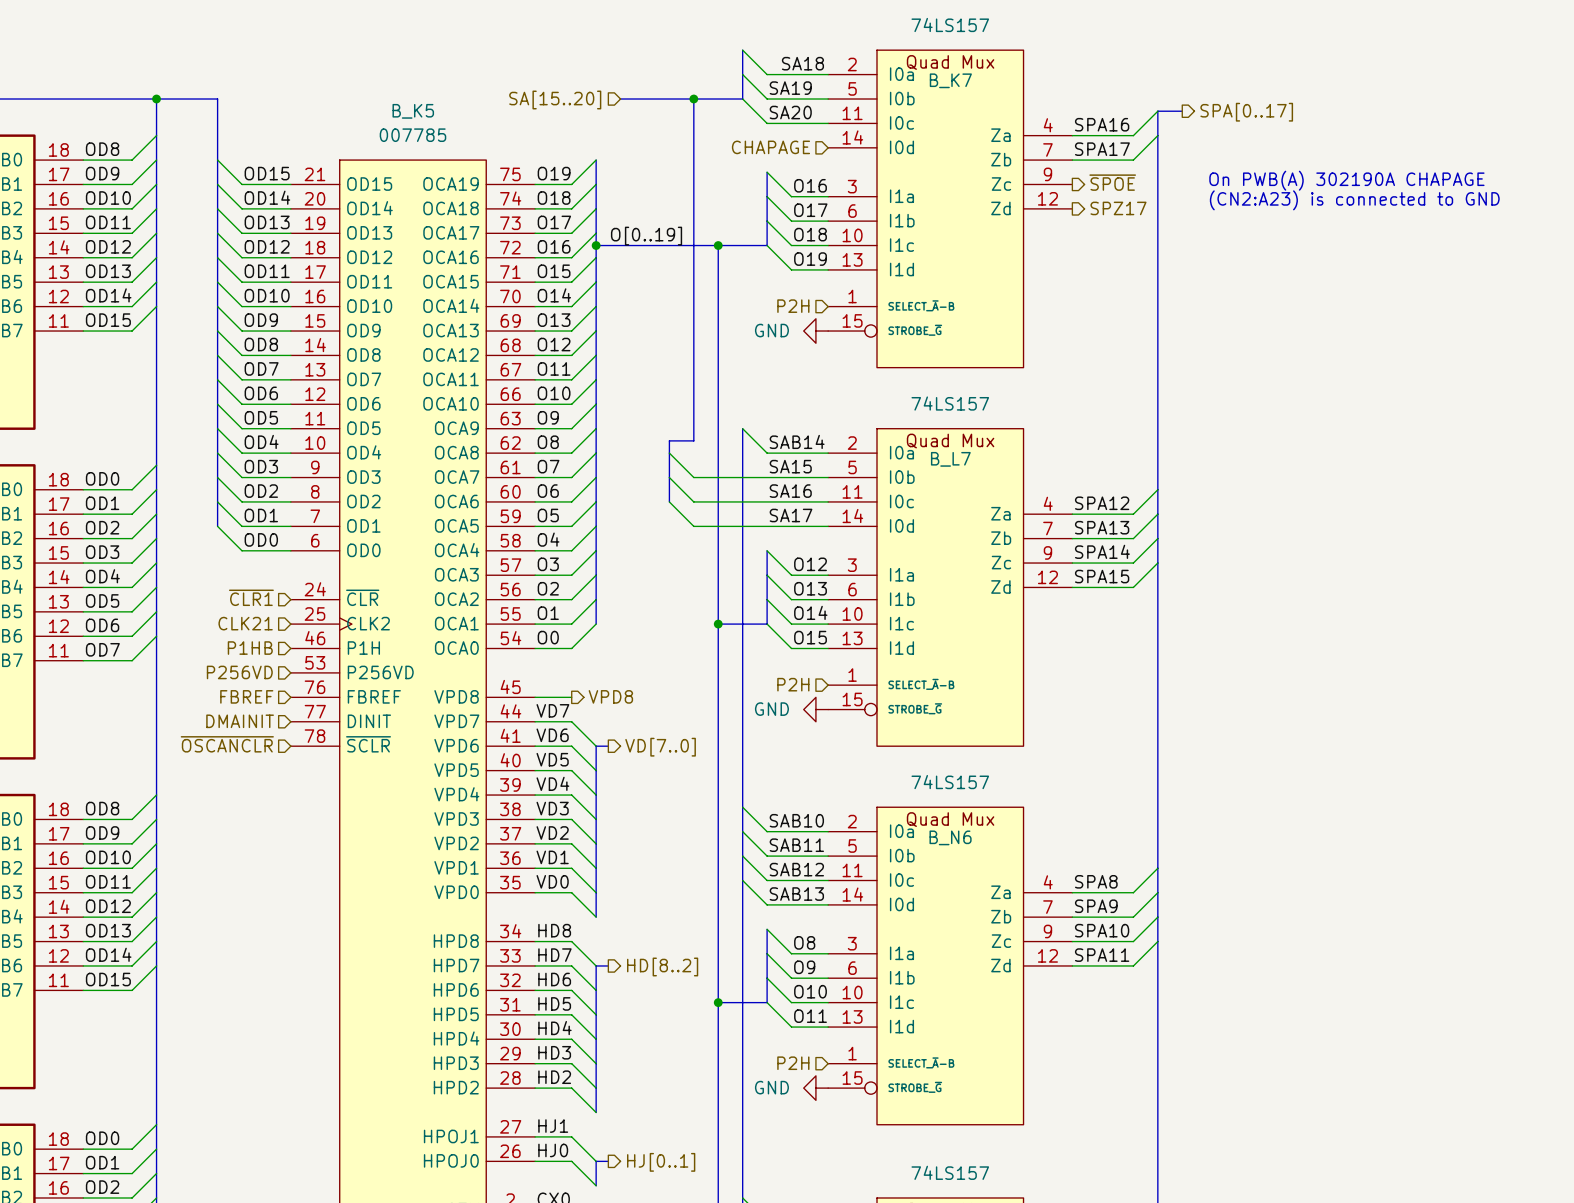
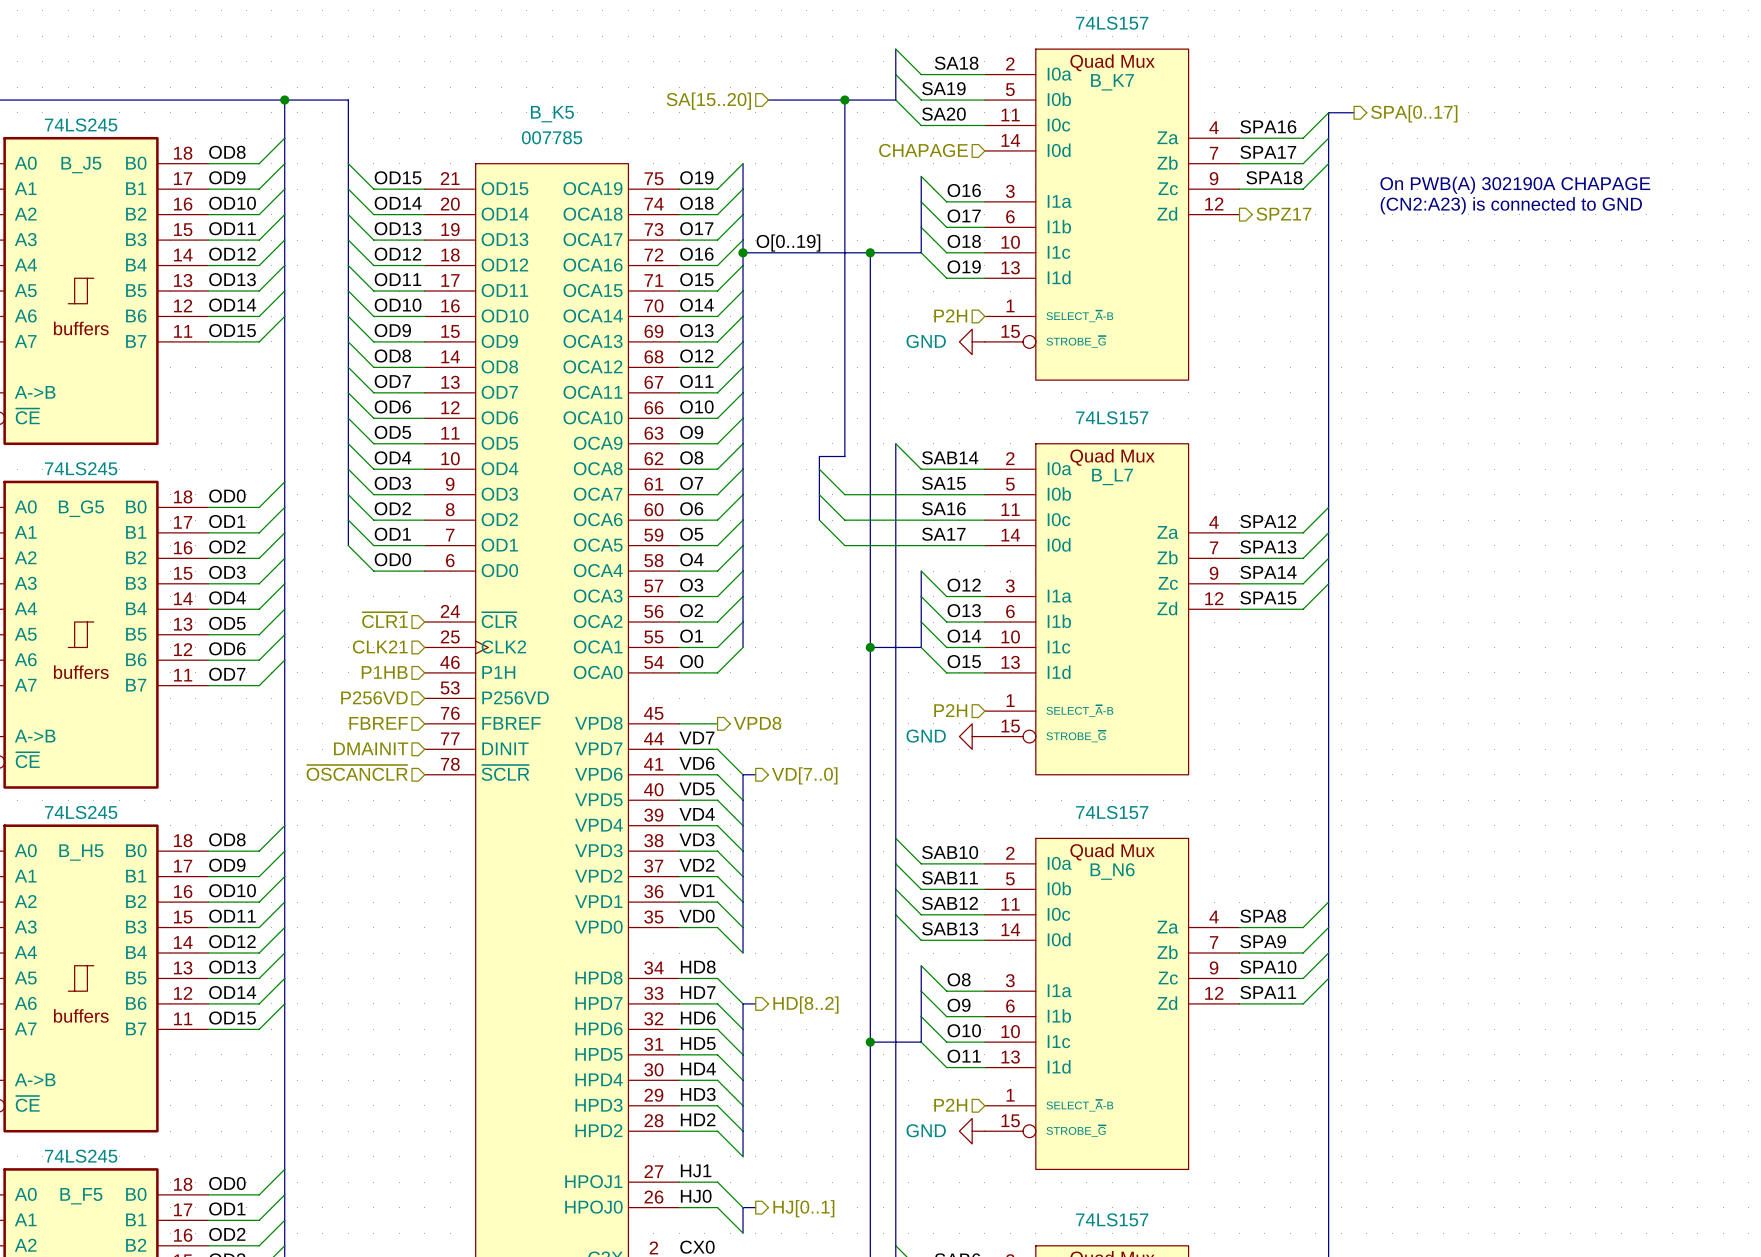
wire: none -> (1328, 163) (1303, 189) (1239, 189)
label: none -> SPA18 (1274, 177)
hierarchical label: ~{SPOE} (1112, 182) -> none

